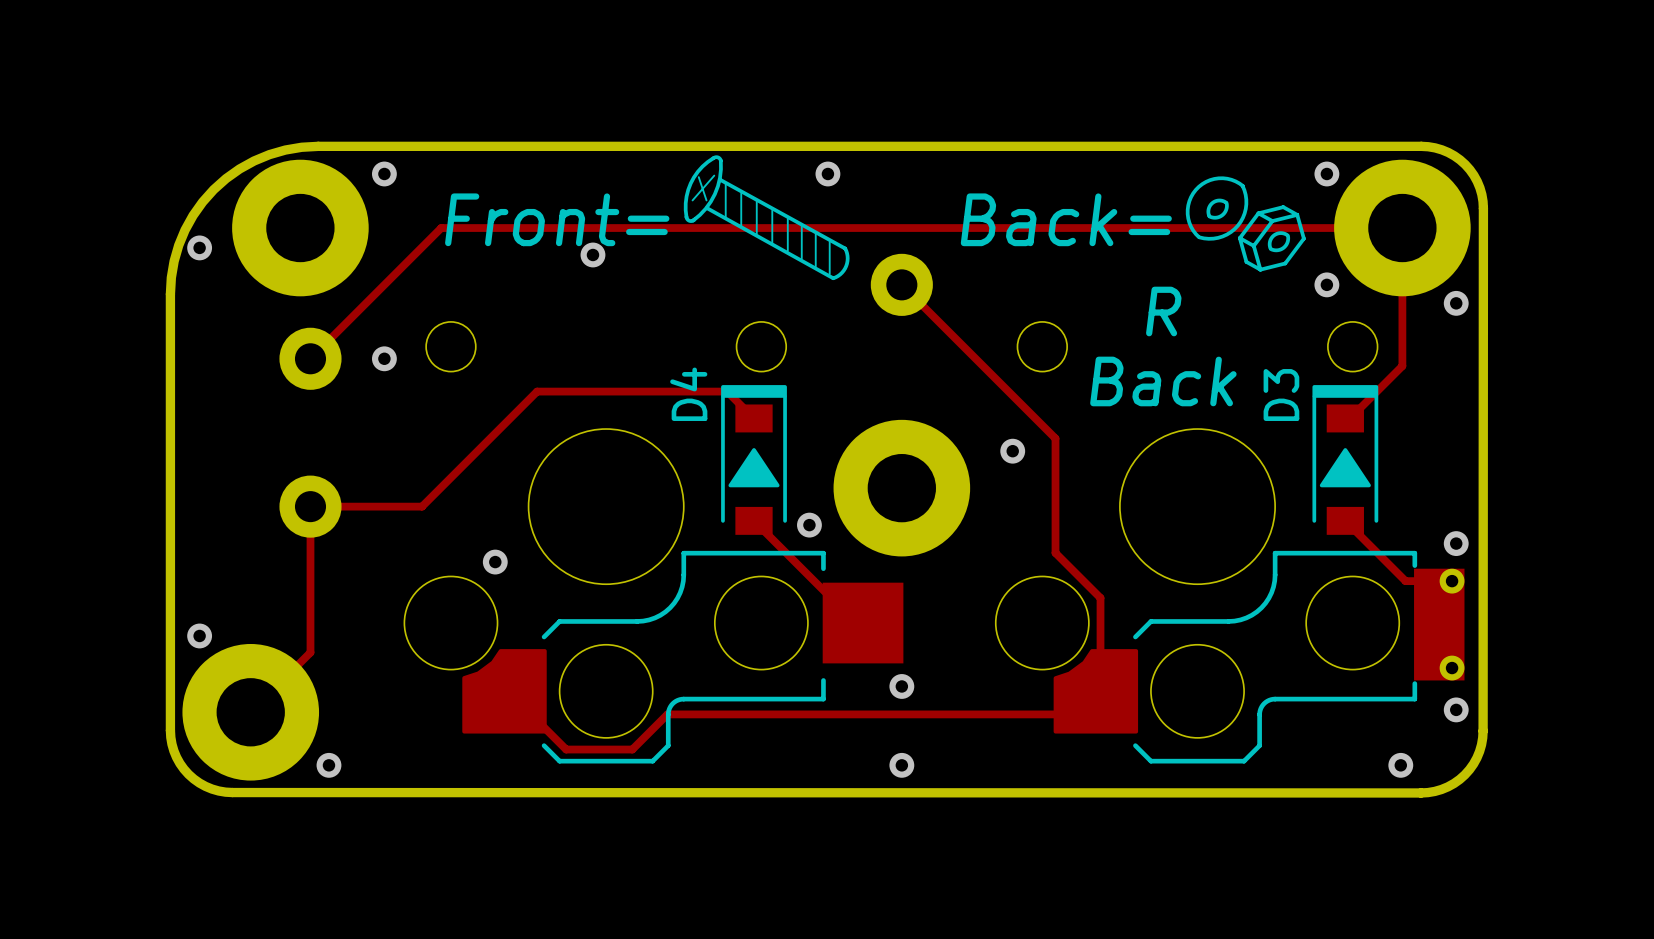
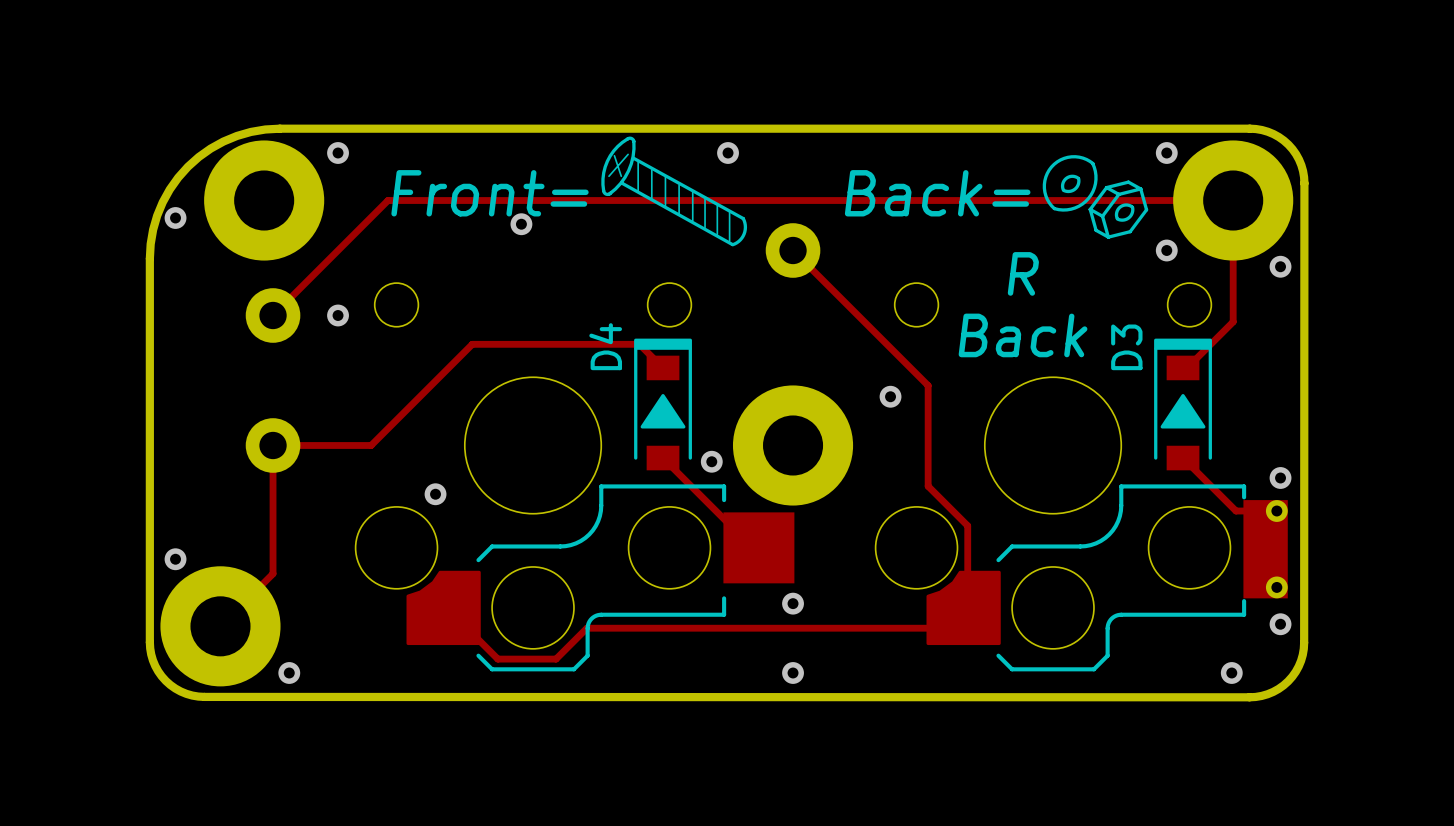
part position: (901, 488) -> (793, 445)

